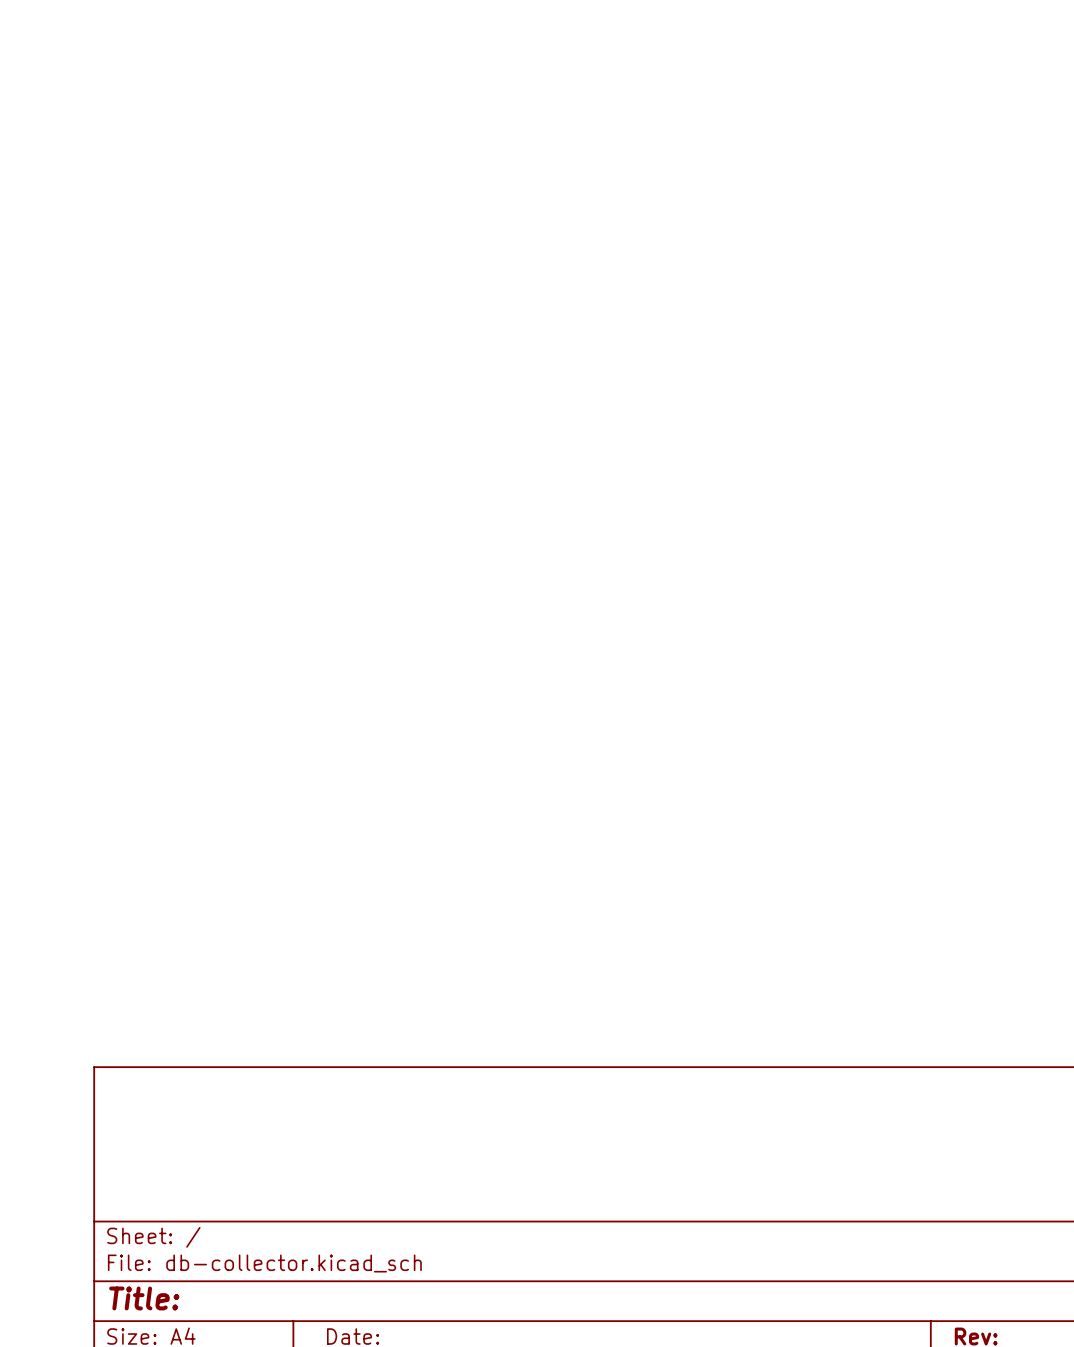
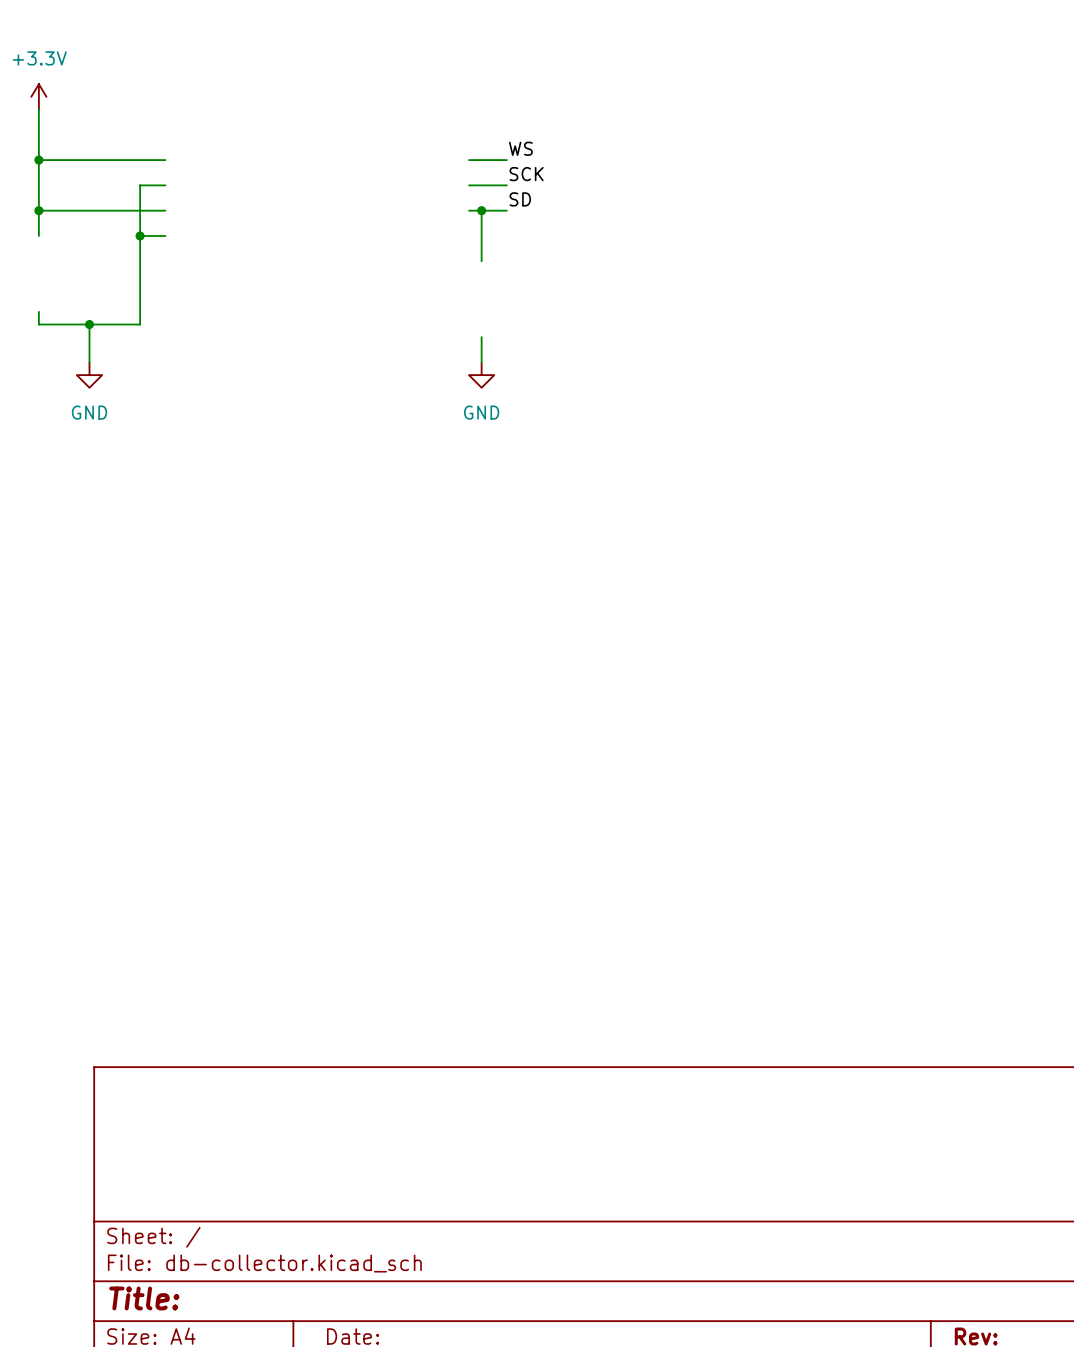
power symbol: none -> +3.3V (38, 96)
wire: none -> (38, 109) (38, 235)
label: none -> WS (520, 148)
wire: none -> (38, 160) (165, 160)
junction: none -> (38, 160)
wire: none -> (468, 160) (506, 160)
label: none -> SCK (526, 174)
wire: none -> (165, 185) (140, 185) (140, 324) (38, 324) (38, 311)
wire: none -> (468, 185) (506, 185)
label: none -> SD (520, 199)
wire: none -> (38, 210) (165, 210)
junction: none -> (38, 210)
wire: none -> (468, 210) (506, 210)
wire: none -> (481, 210) (481, 261)
junction: none -> (481, 210)
wire: none -> (140, 235) (165, 235)
junction: none -> (140, 235)
wire: none -> (89, 324) (89, 362)
junction: none -> (89, 324)
wire: none -> (481, 337) (481, 362)
power symbol: none -> GND (89, 375)
power symbol: none -> GND (481, 375)

